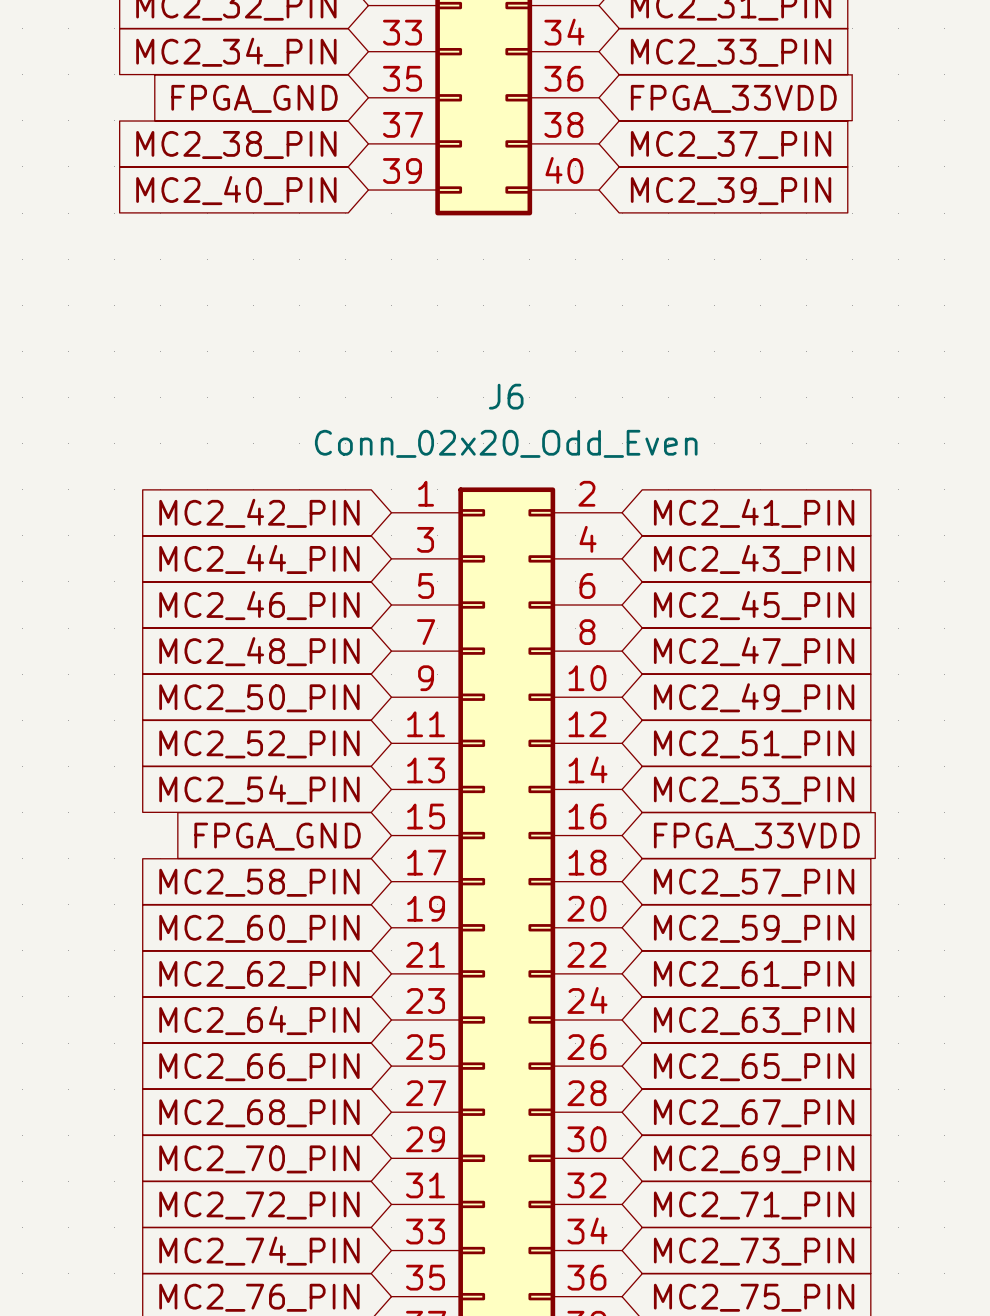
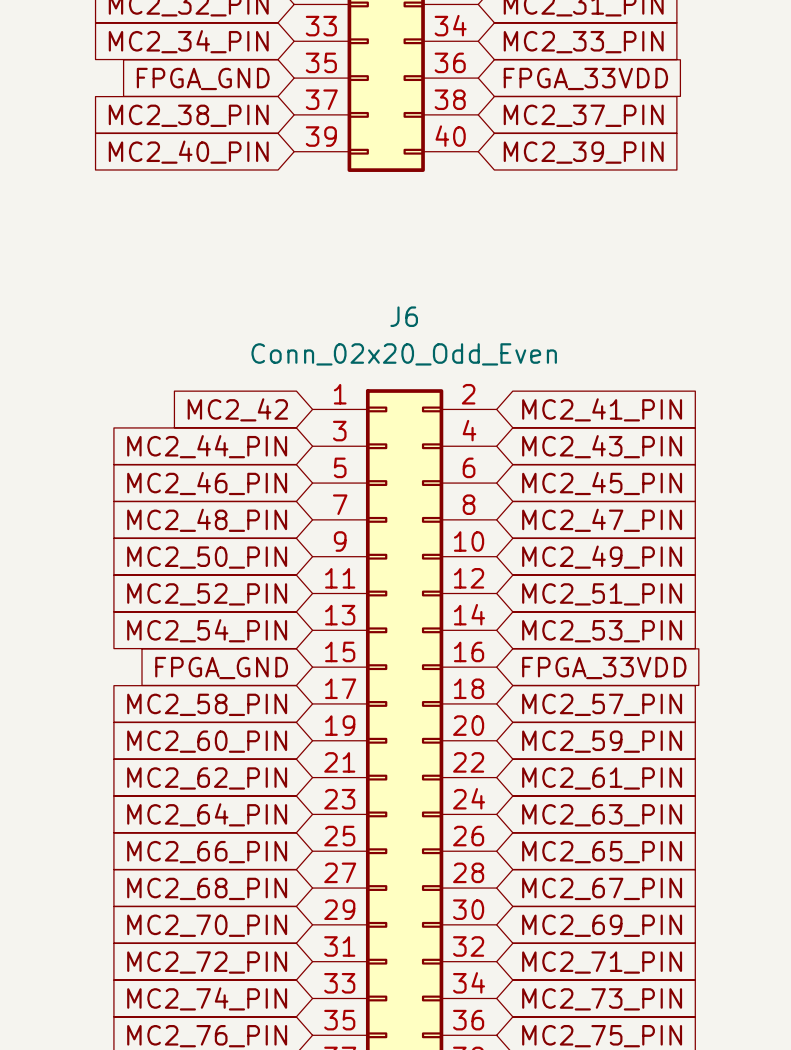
global label: MC2_42_PIN (259, 513) -> MC2_42 (237, 409)

